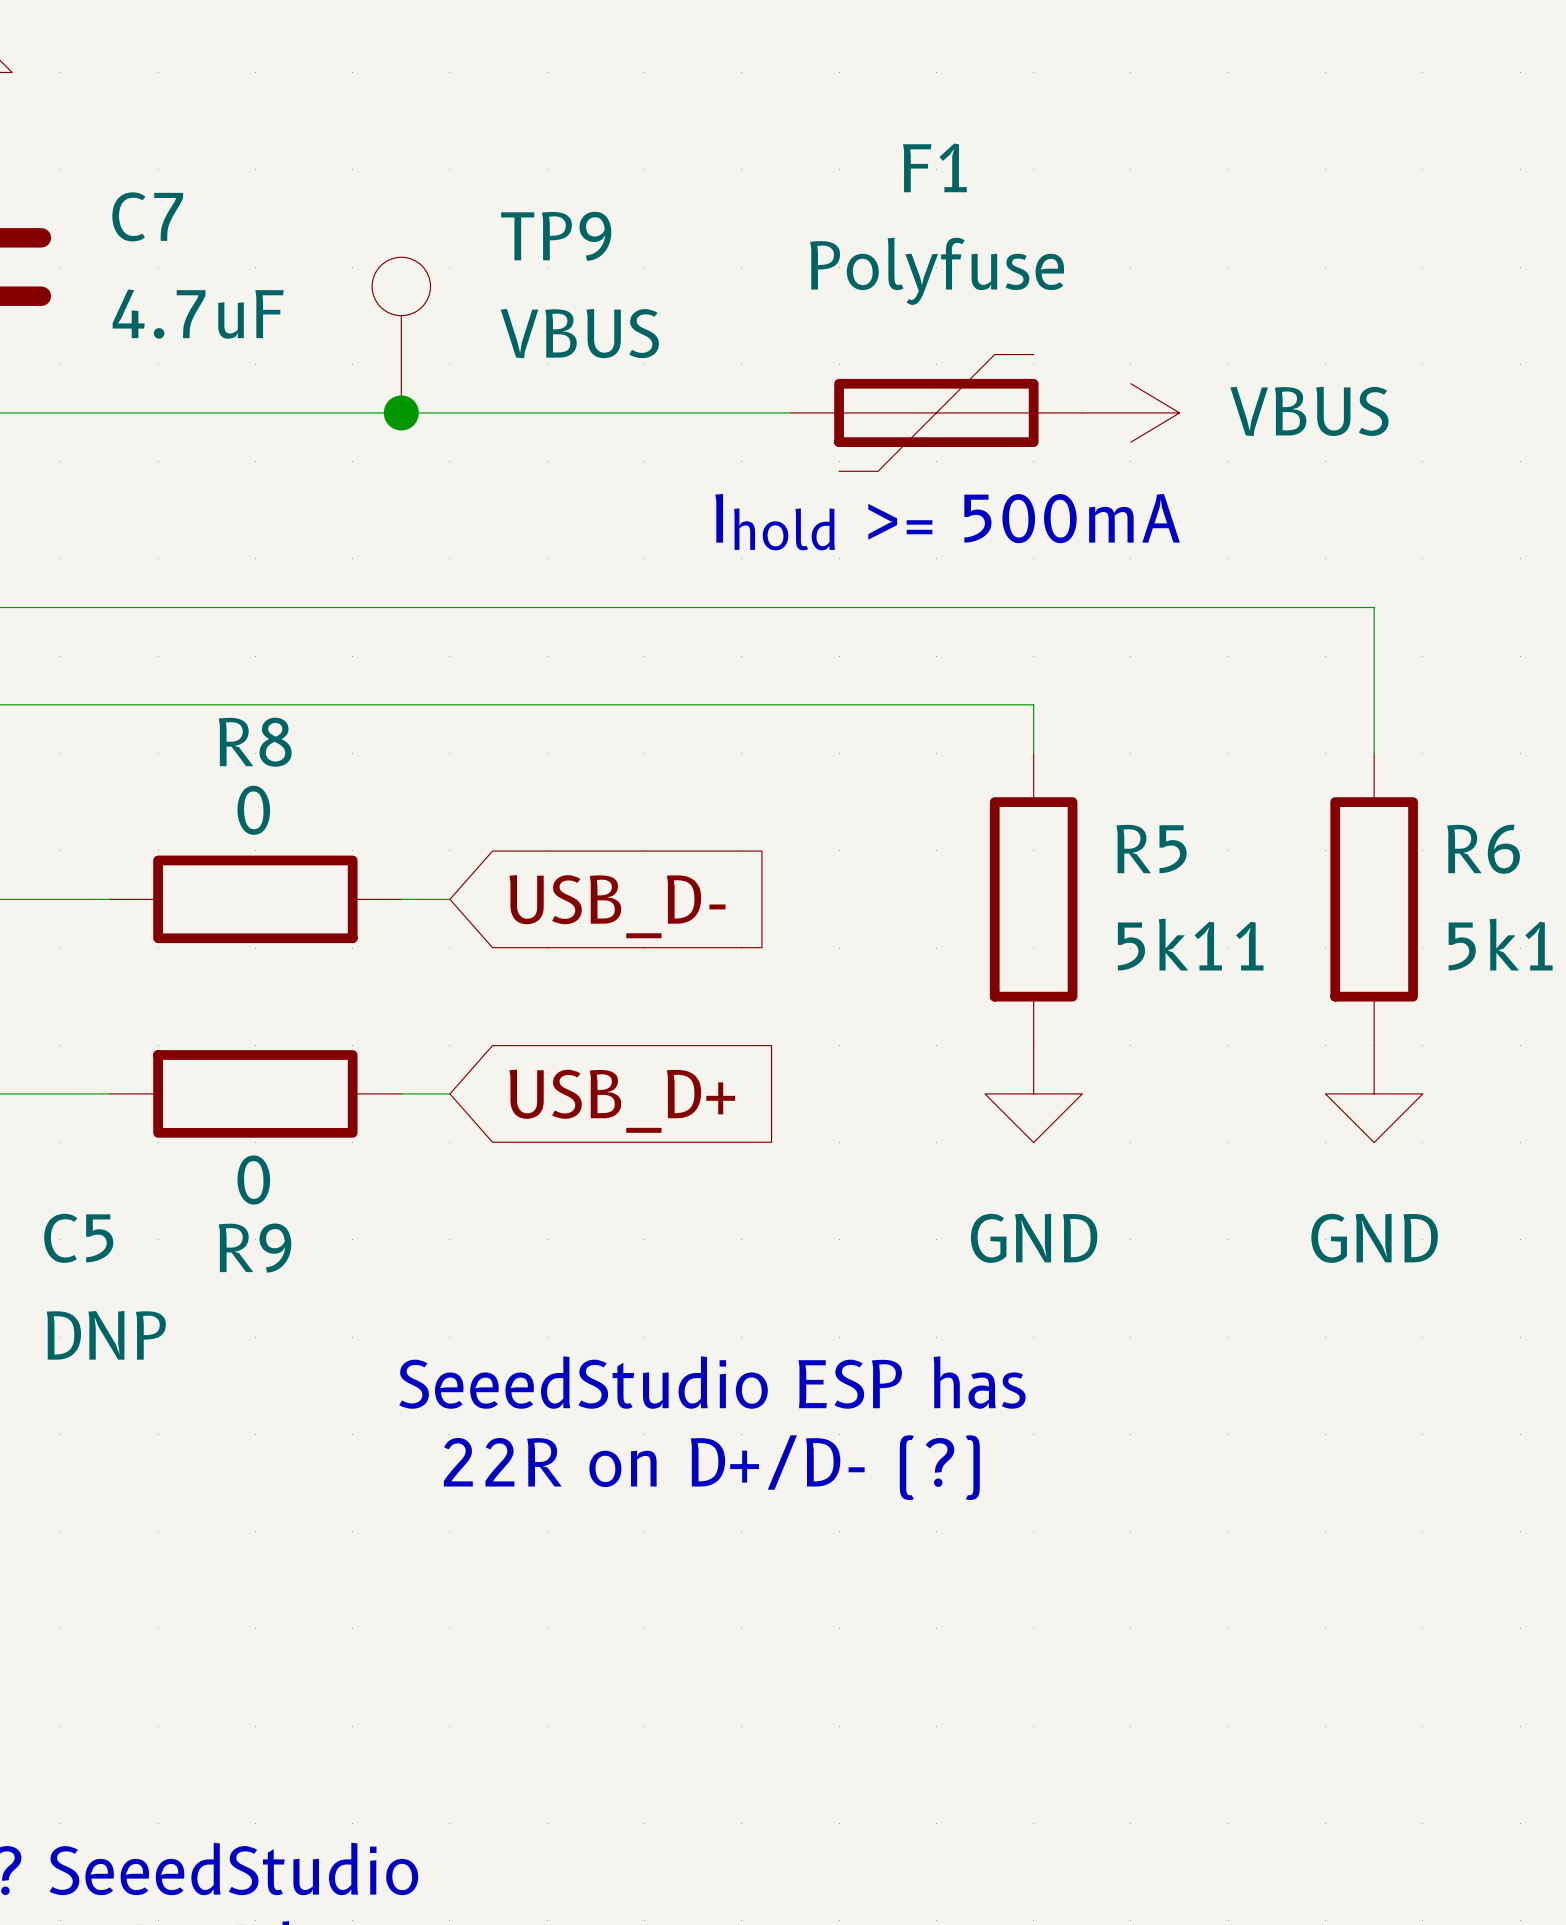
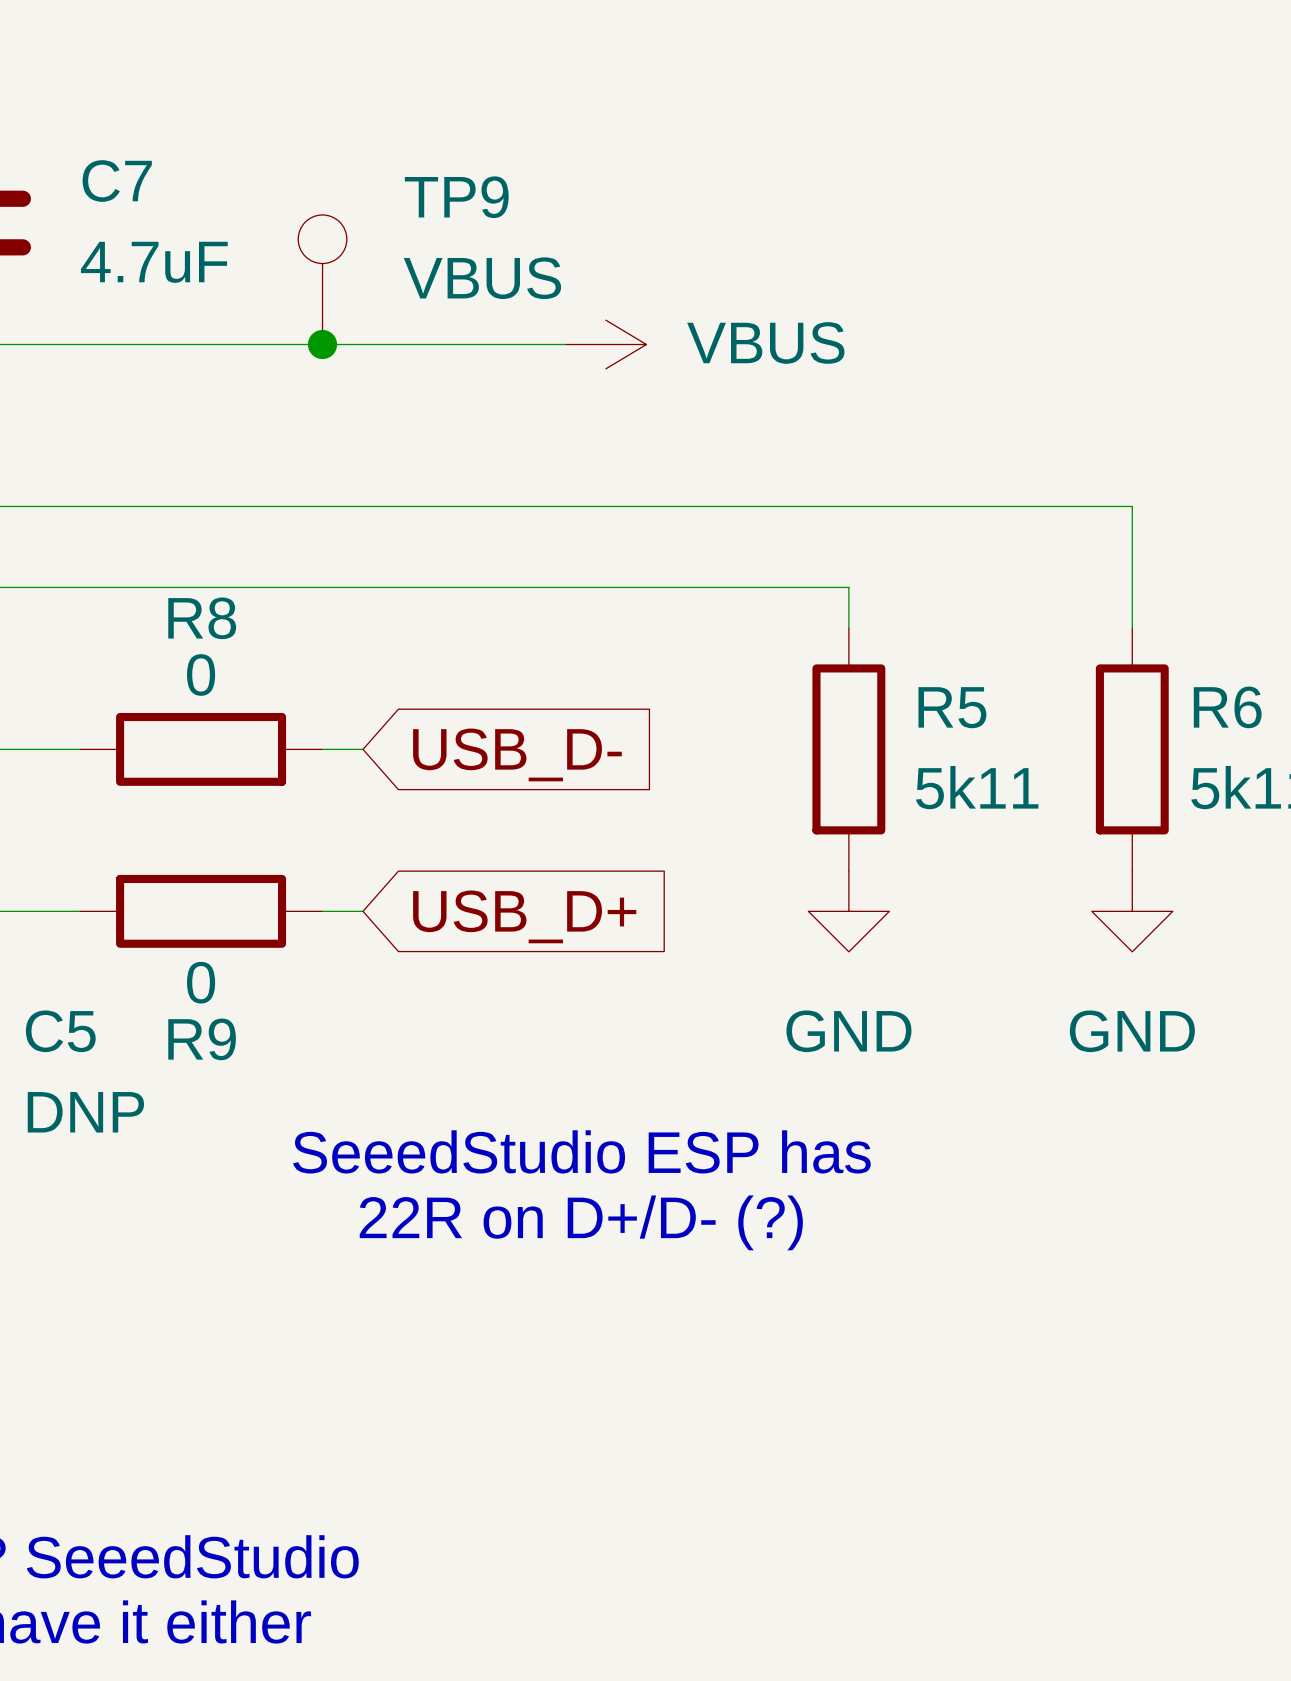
F1: Polyfuse (936, 412) -> none
power symbol position: VBUS (1130, 412) -> VBUS (605, 344)
text: Ihold >= 500mA (947, 522) -> none

